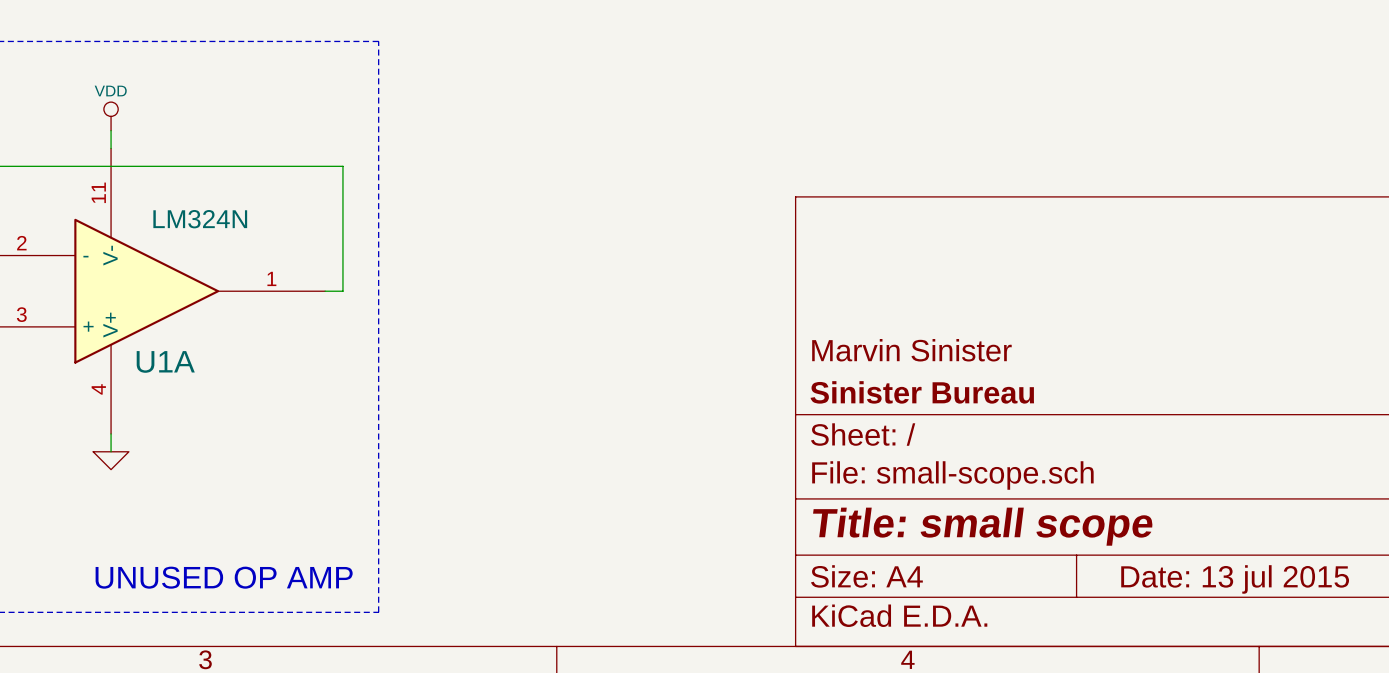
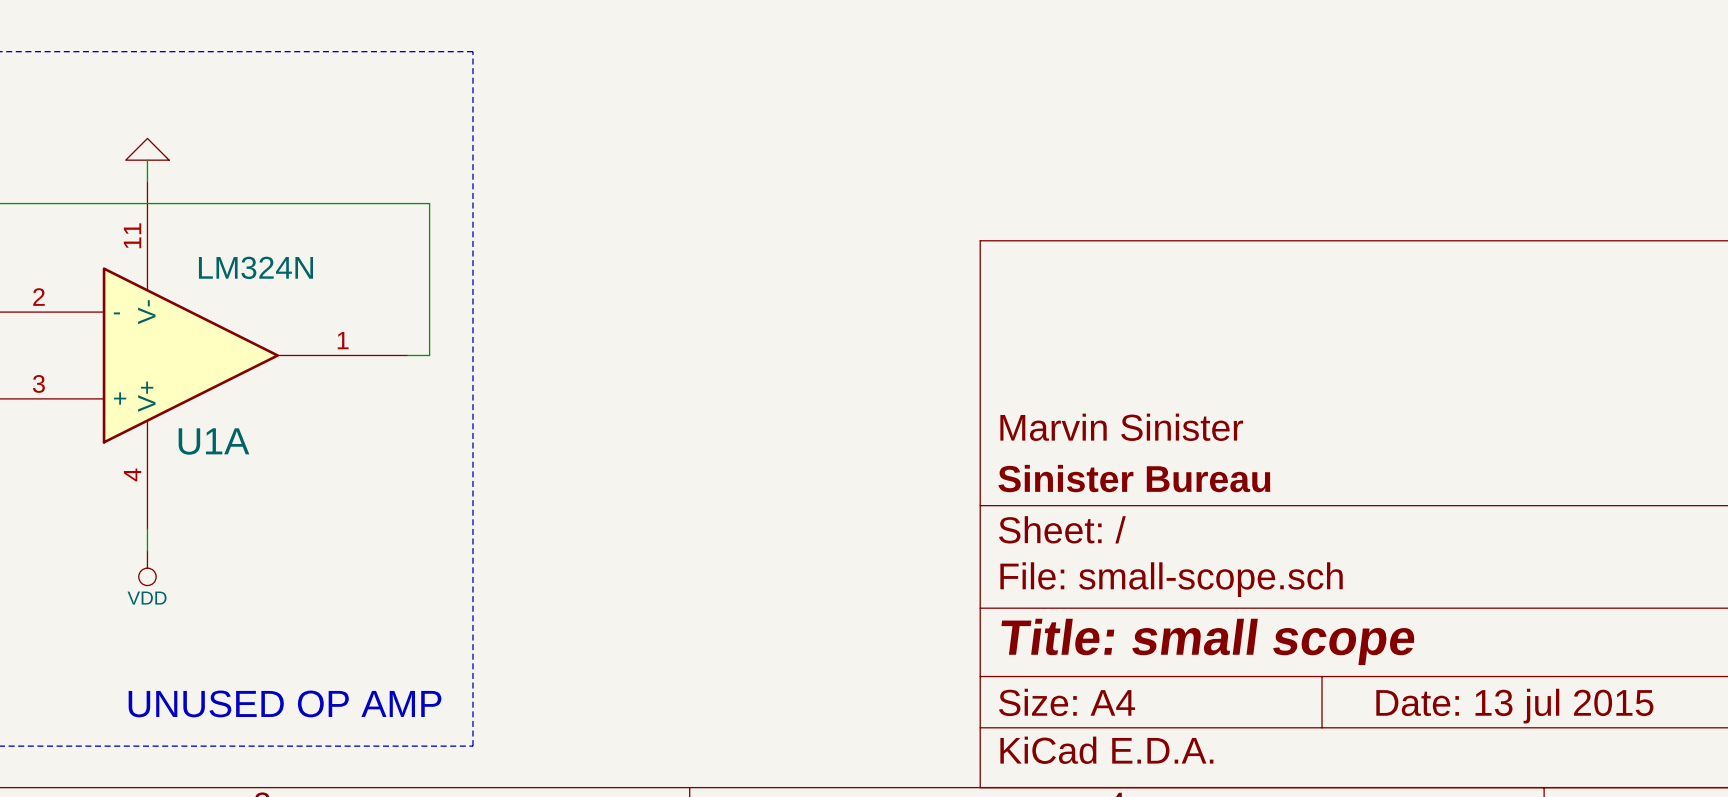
power symbol text: VDD (110, 91) -> none
power symbol shape: [103, 102, 119, 131] -> [125, 138, 170, 161]
power symbol shape: [93, 451, 129, 470] -> [138, 550, 157, 586]
power symbol text: none -> VDD (147, 598)

